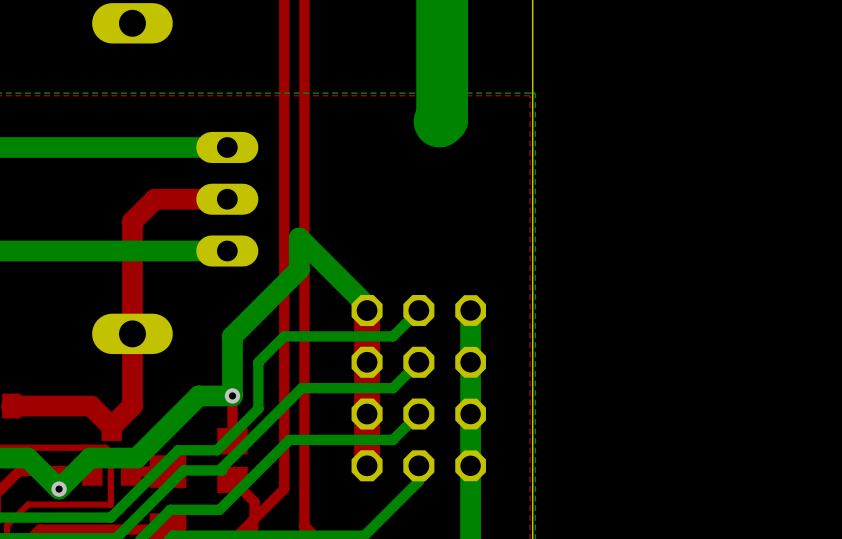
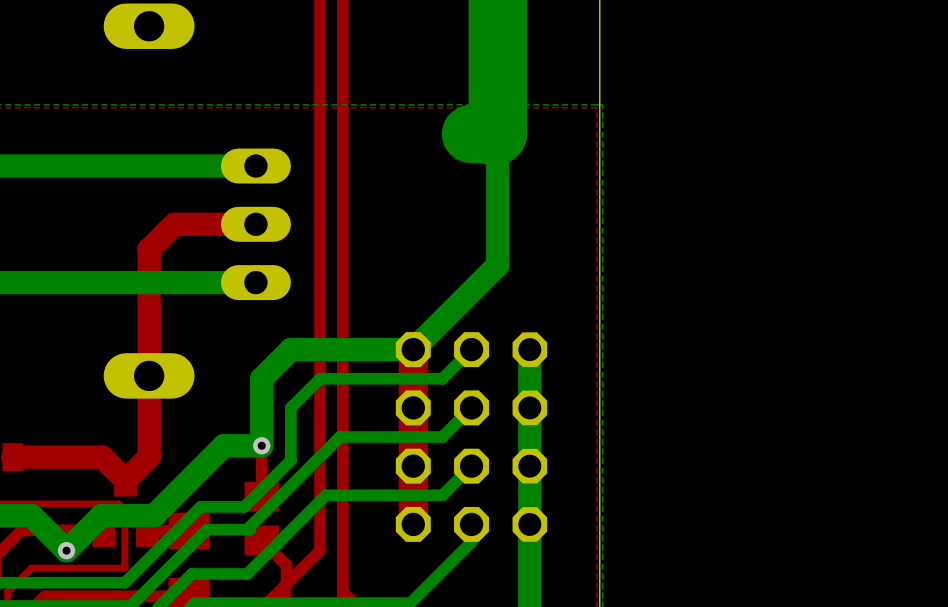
bottom track: (367, 305) (299, 238) (299, 269) (258, 310) -> (470, 133) (497, 133) (497, 265) (413, 349) (290, 349)

